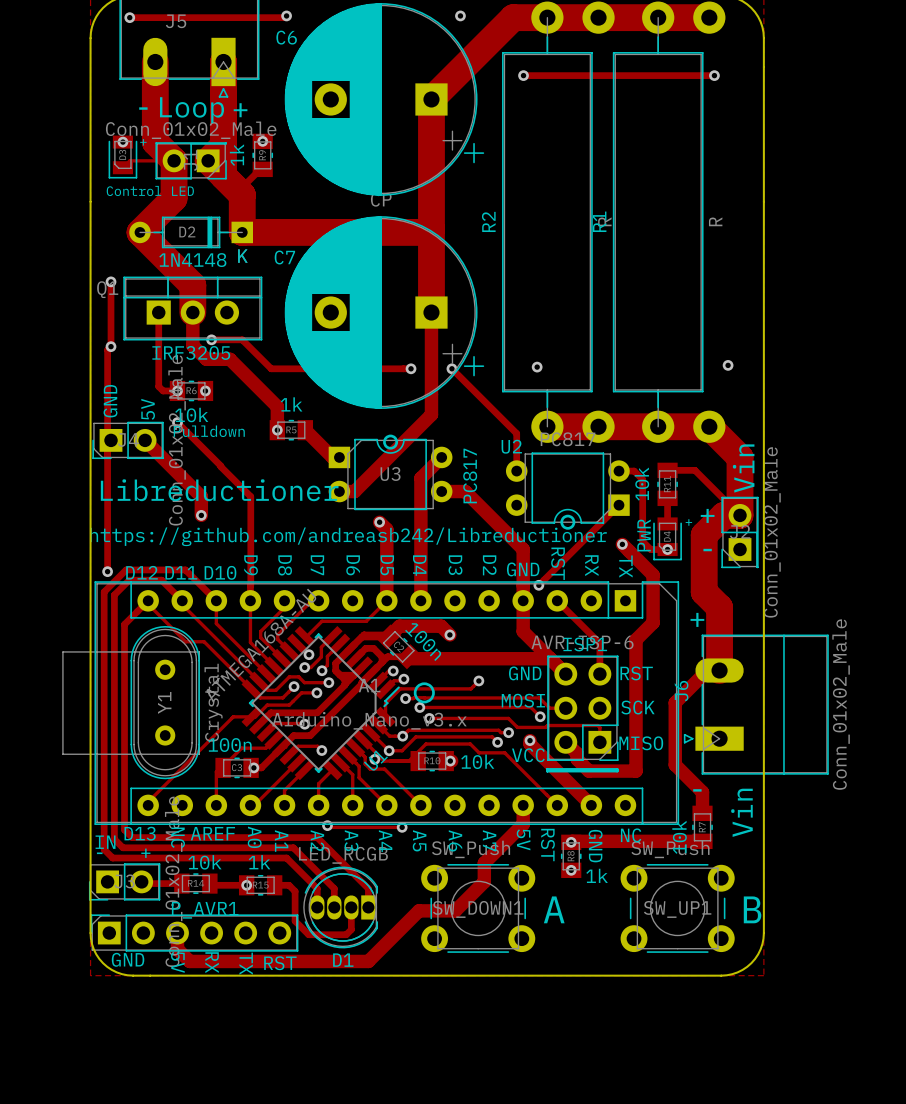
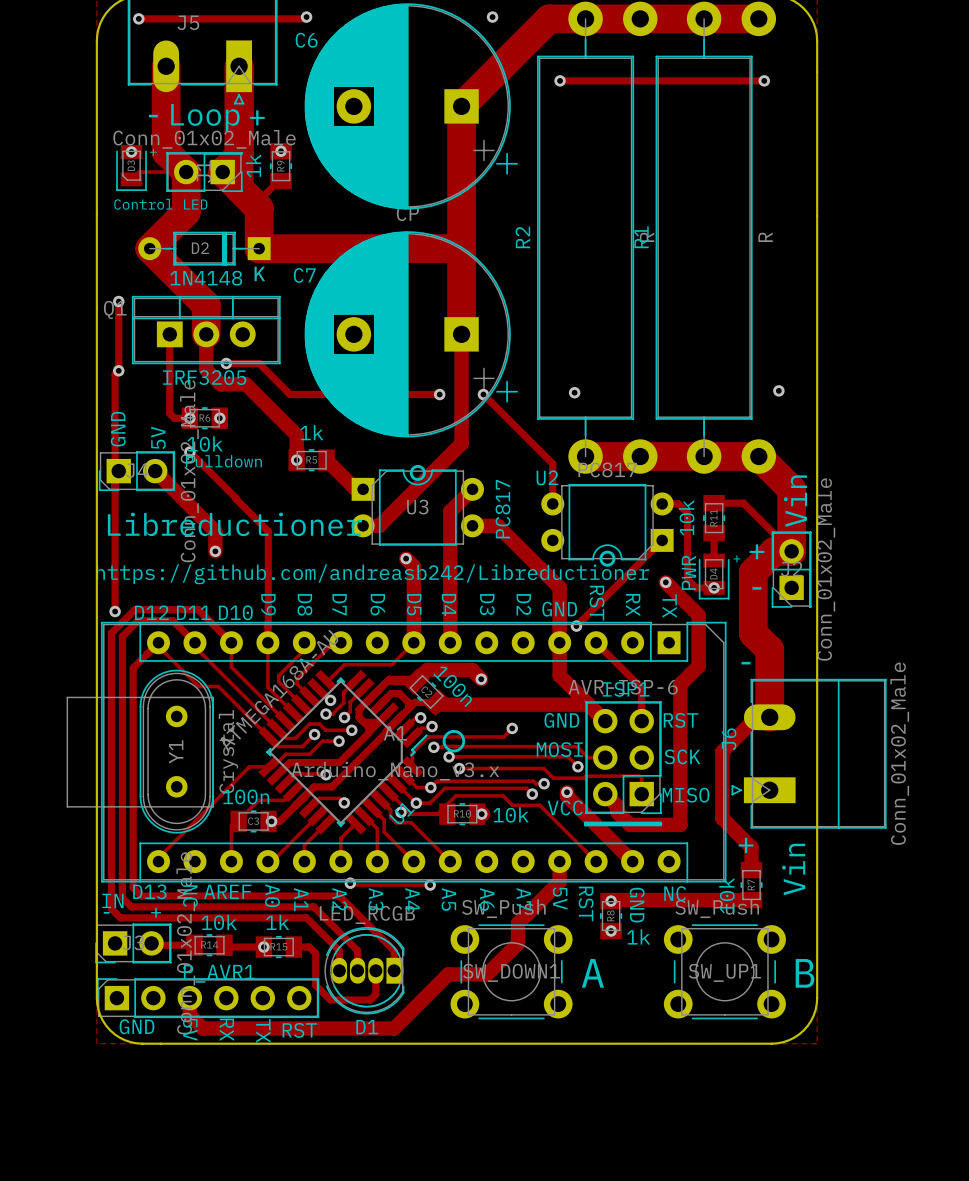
text: + (697, 619) -> - (746, 663)
text: - (697, 790) -> + (746, 845)

